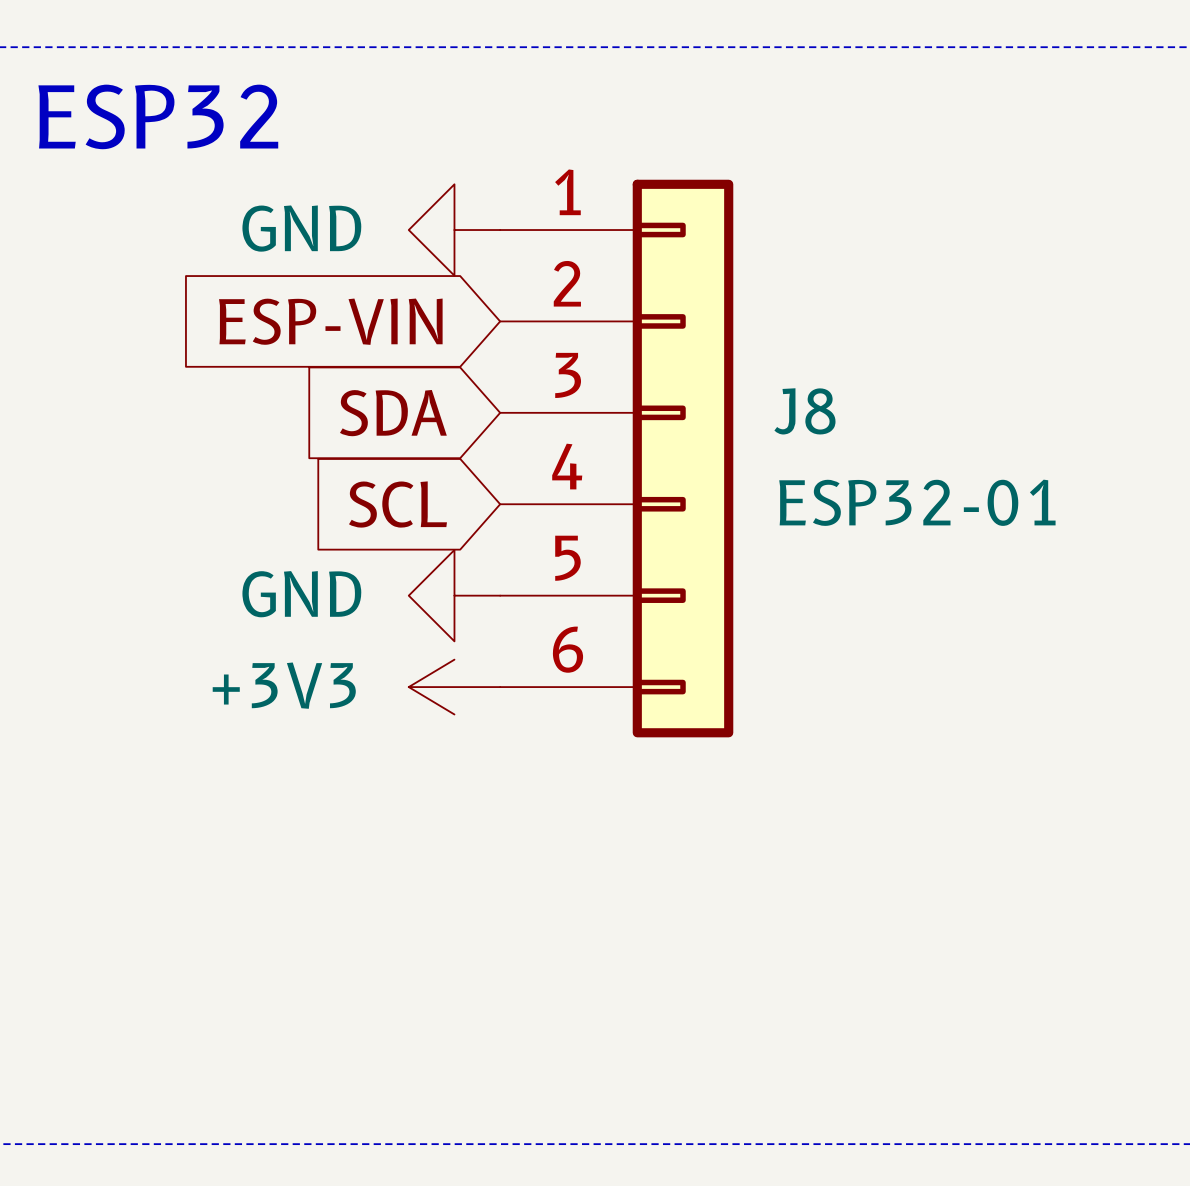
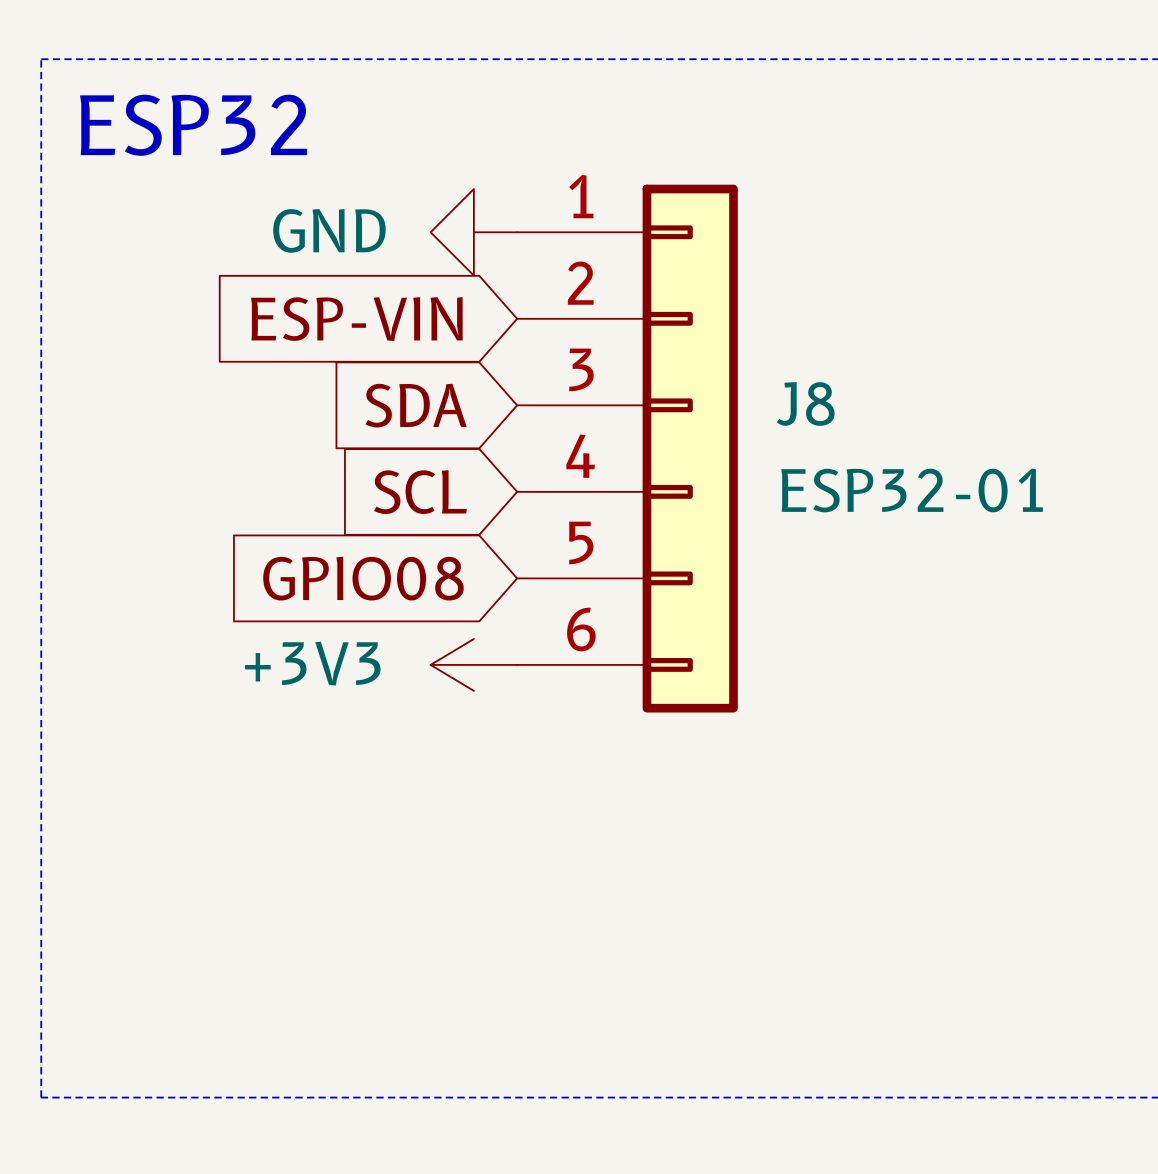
global label: none -> GPIO08 (363, 578)
power symbol: GND (454, 595) -> none

